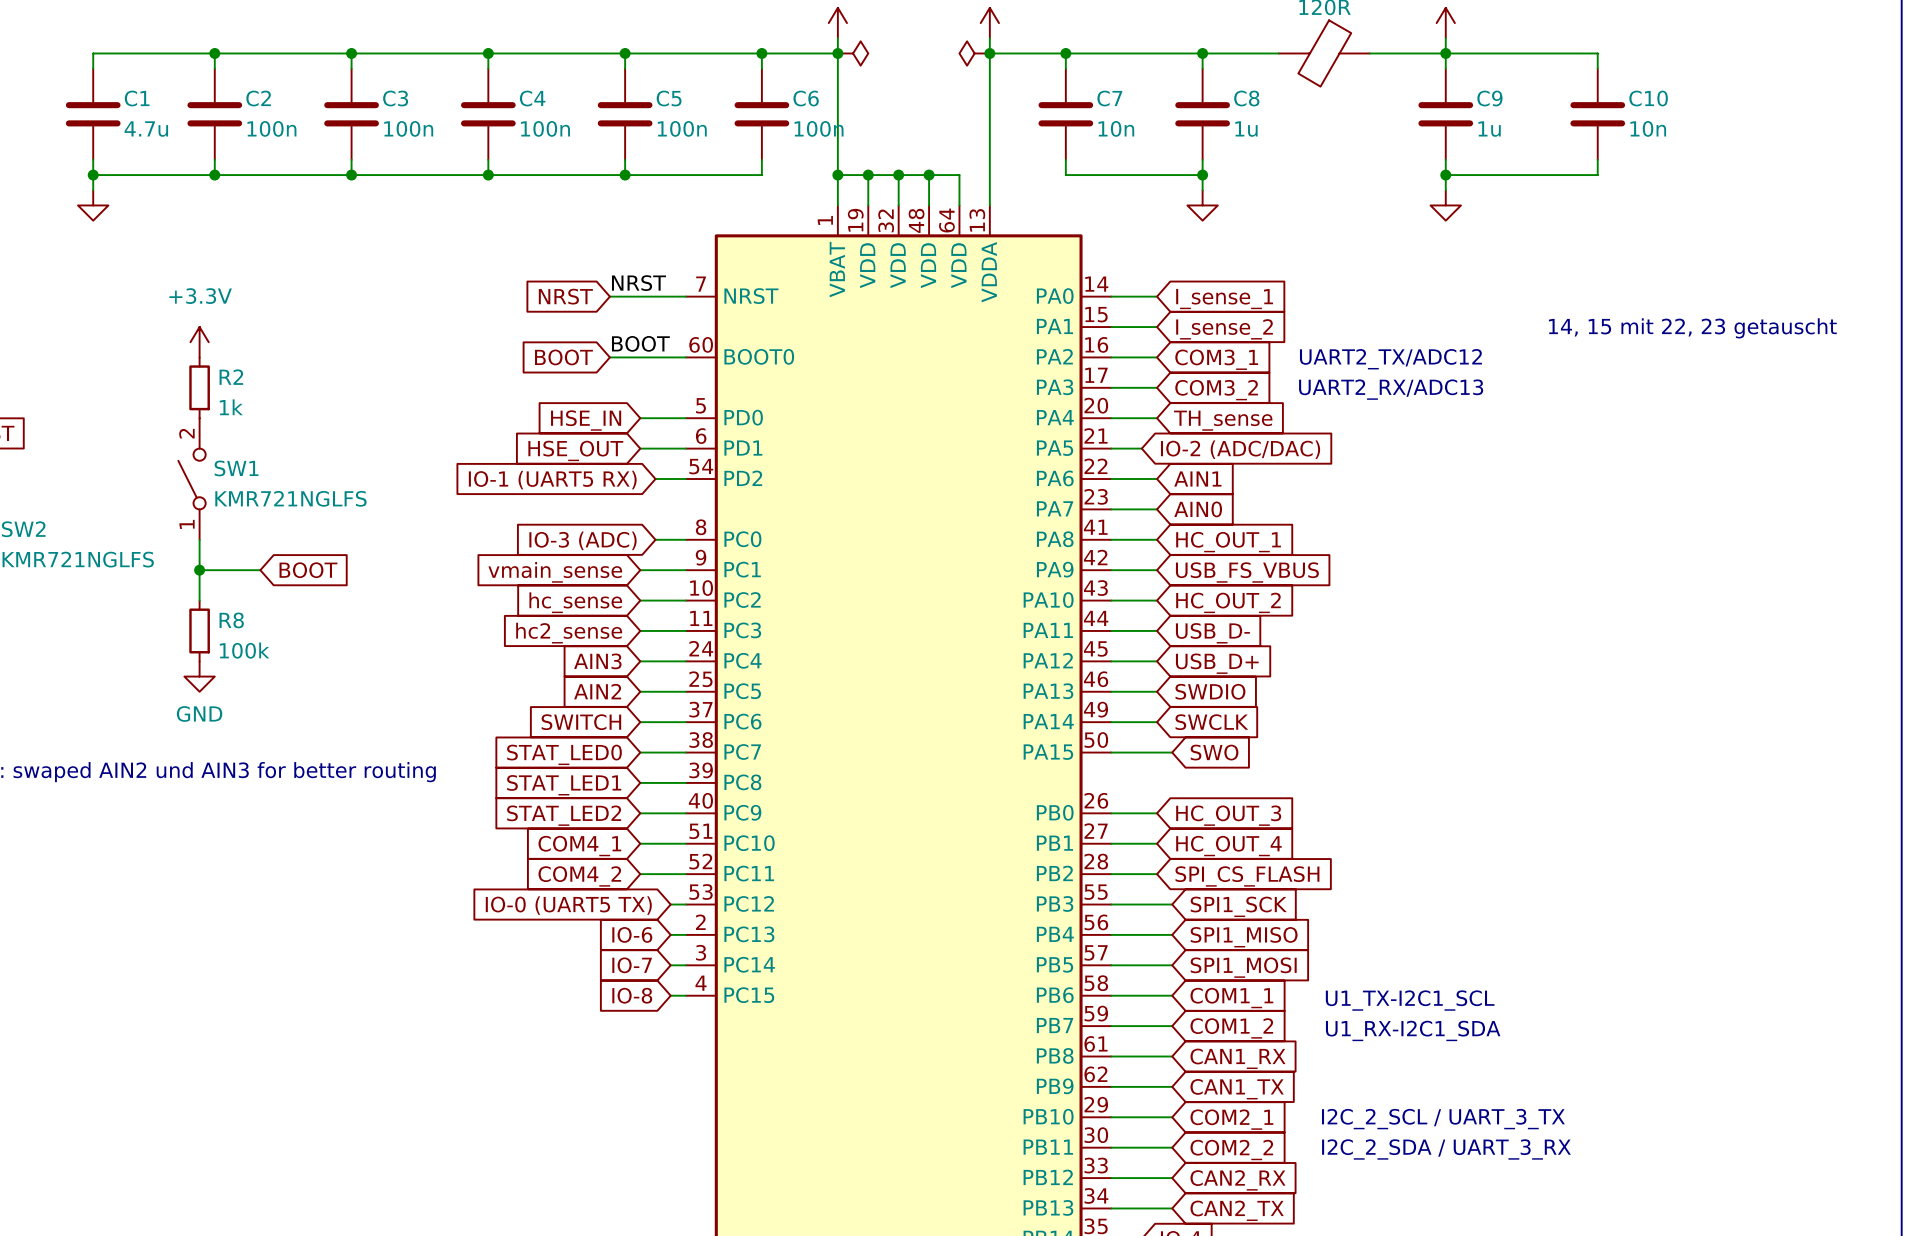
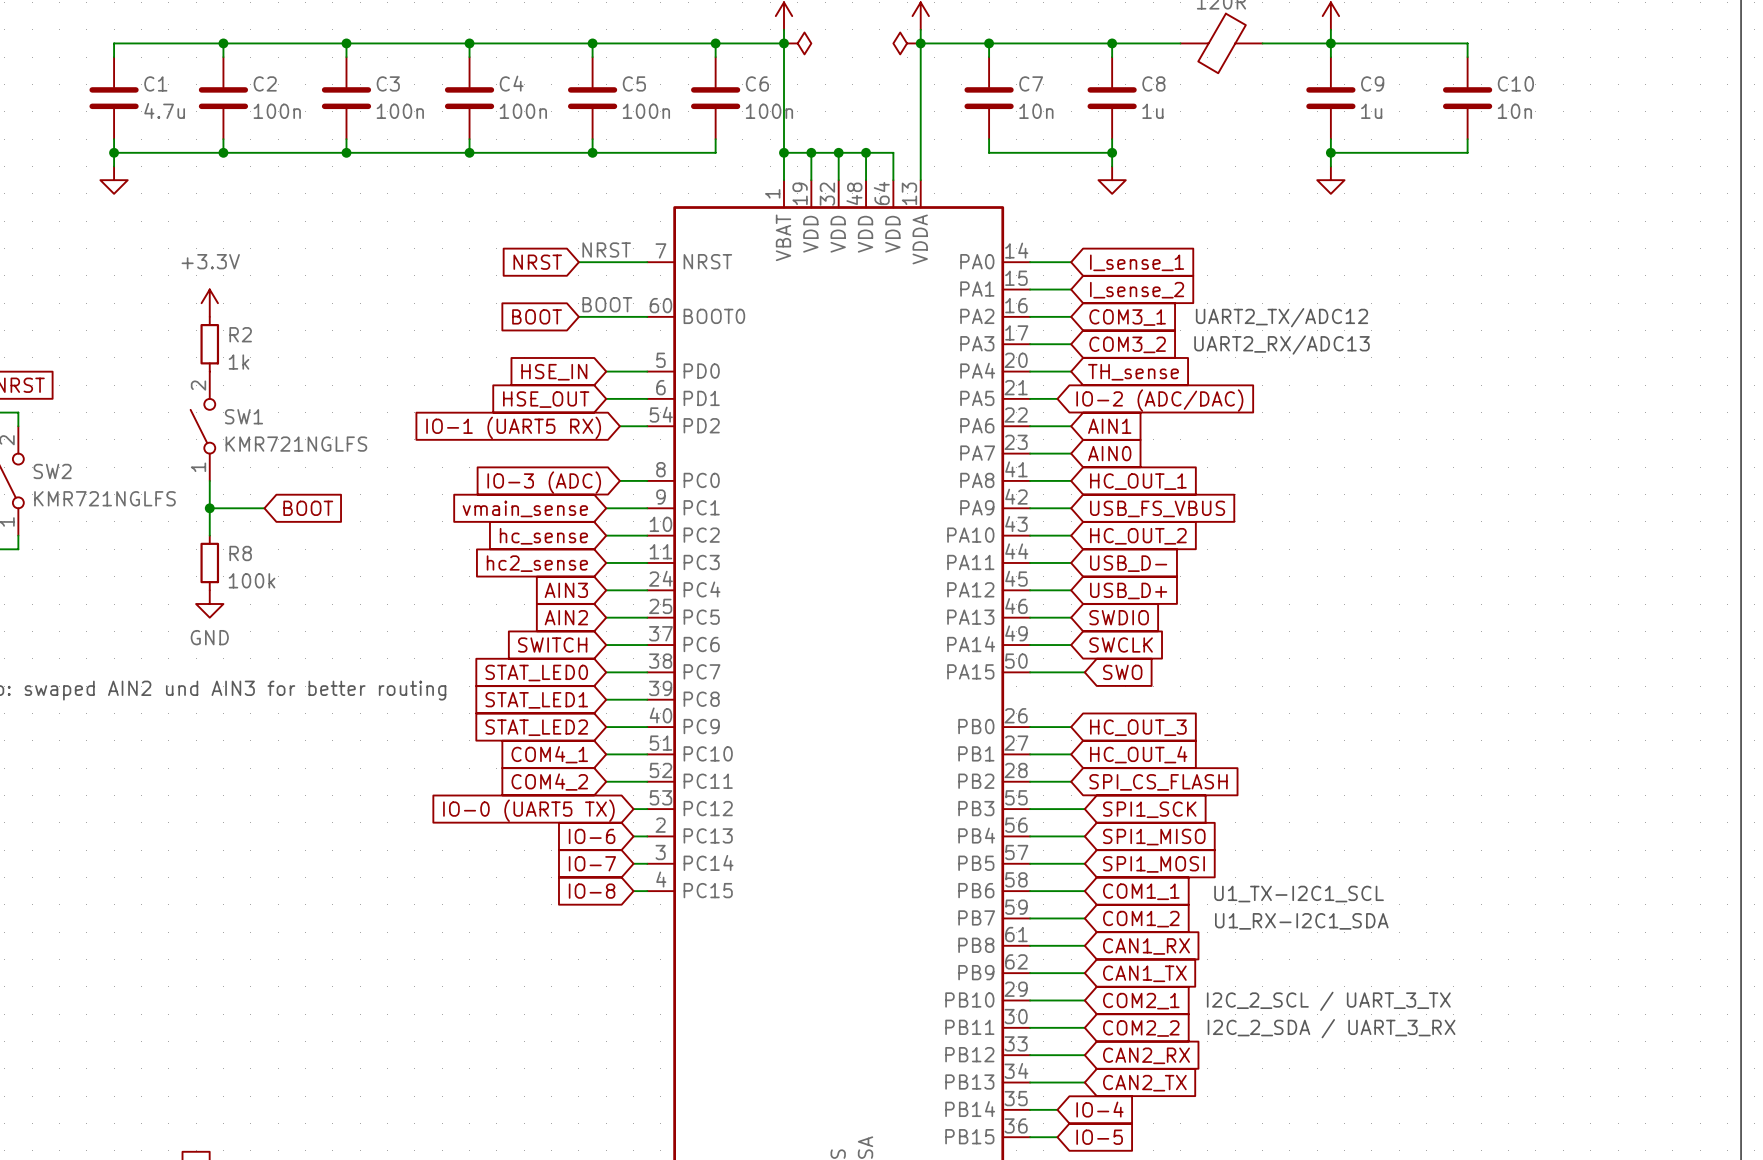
text: 14, 15 mit 22, 23 getauscht (1692, 328) -> none

